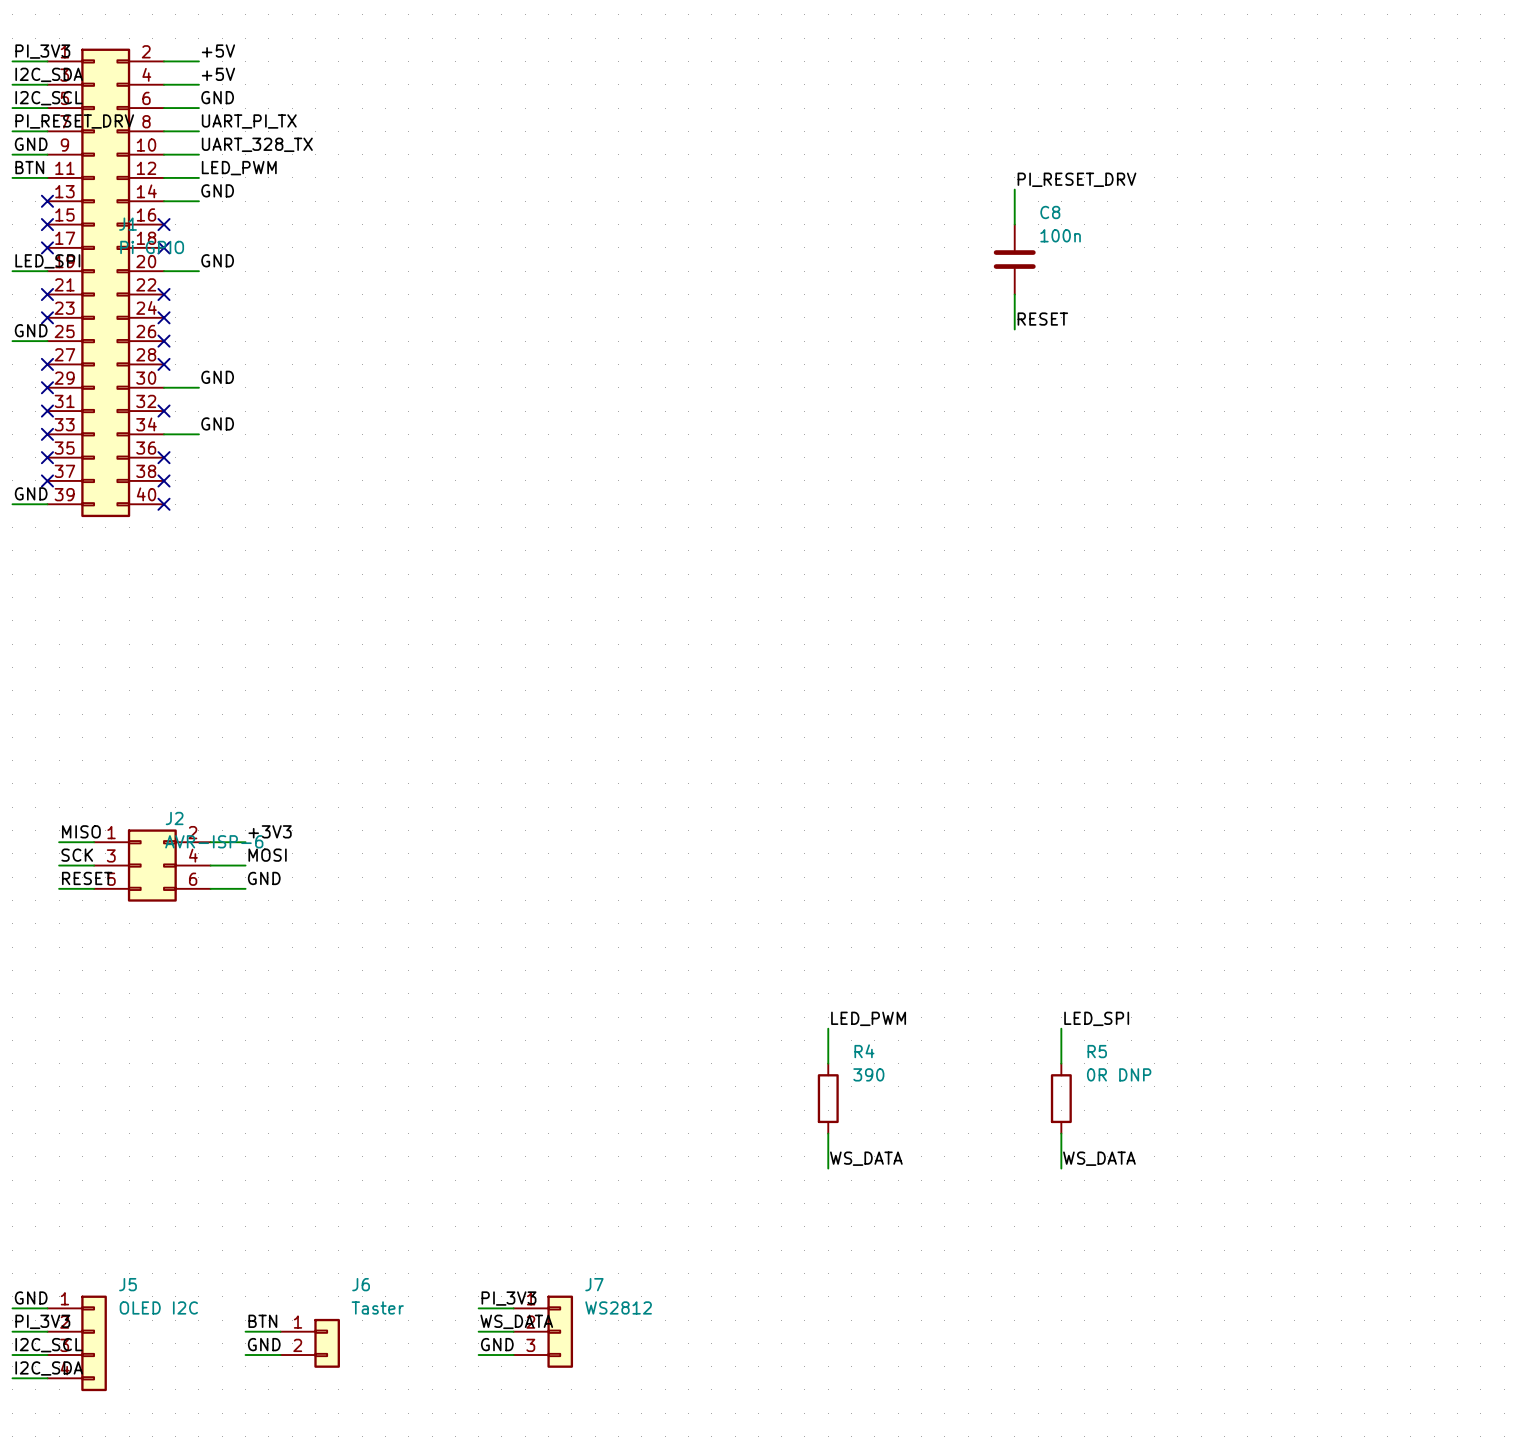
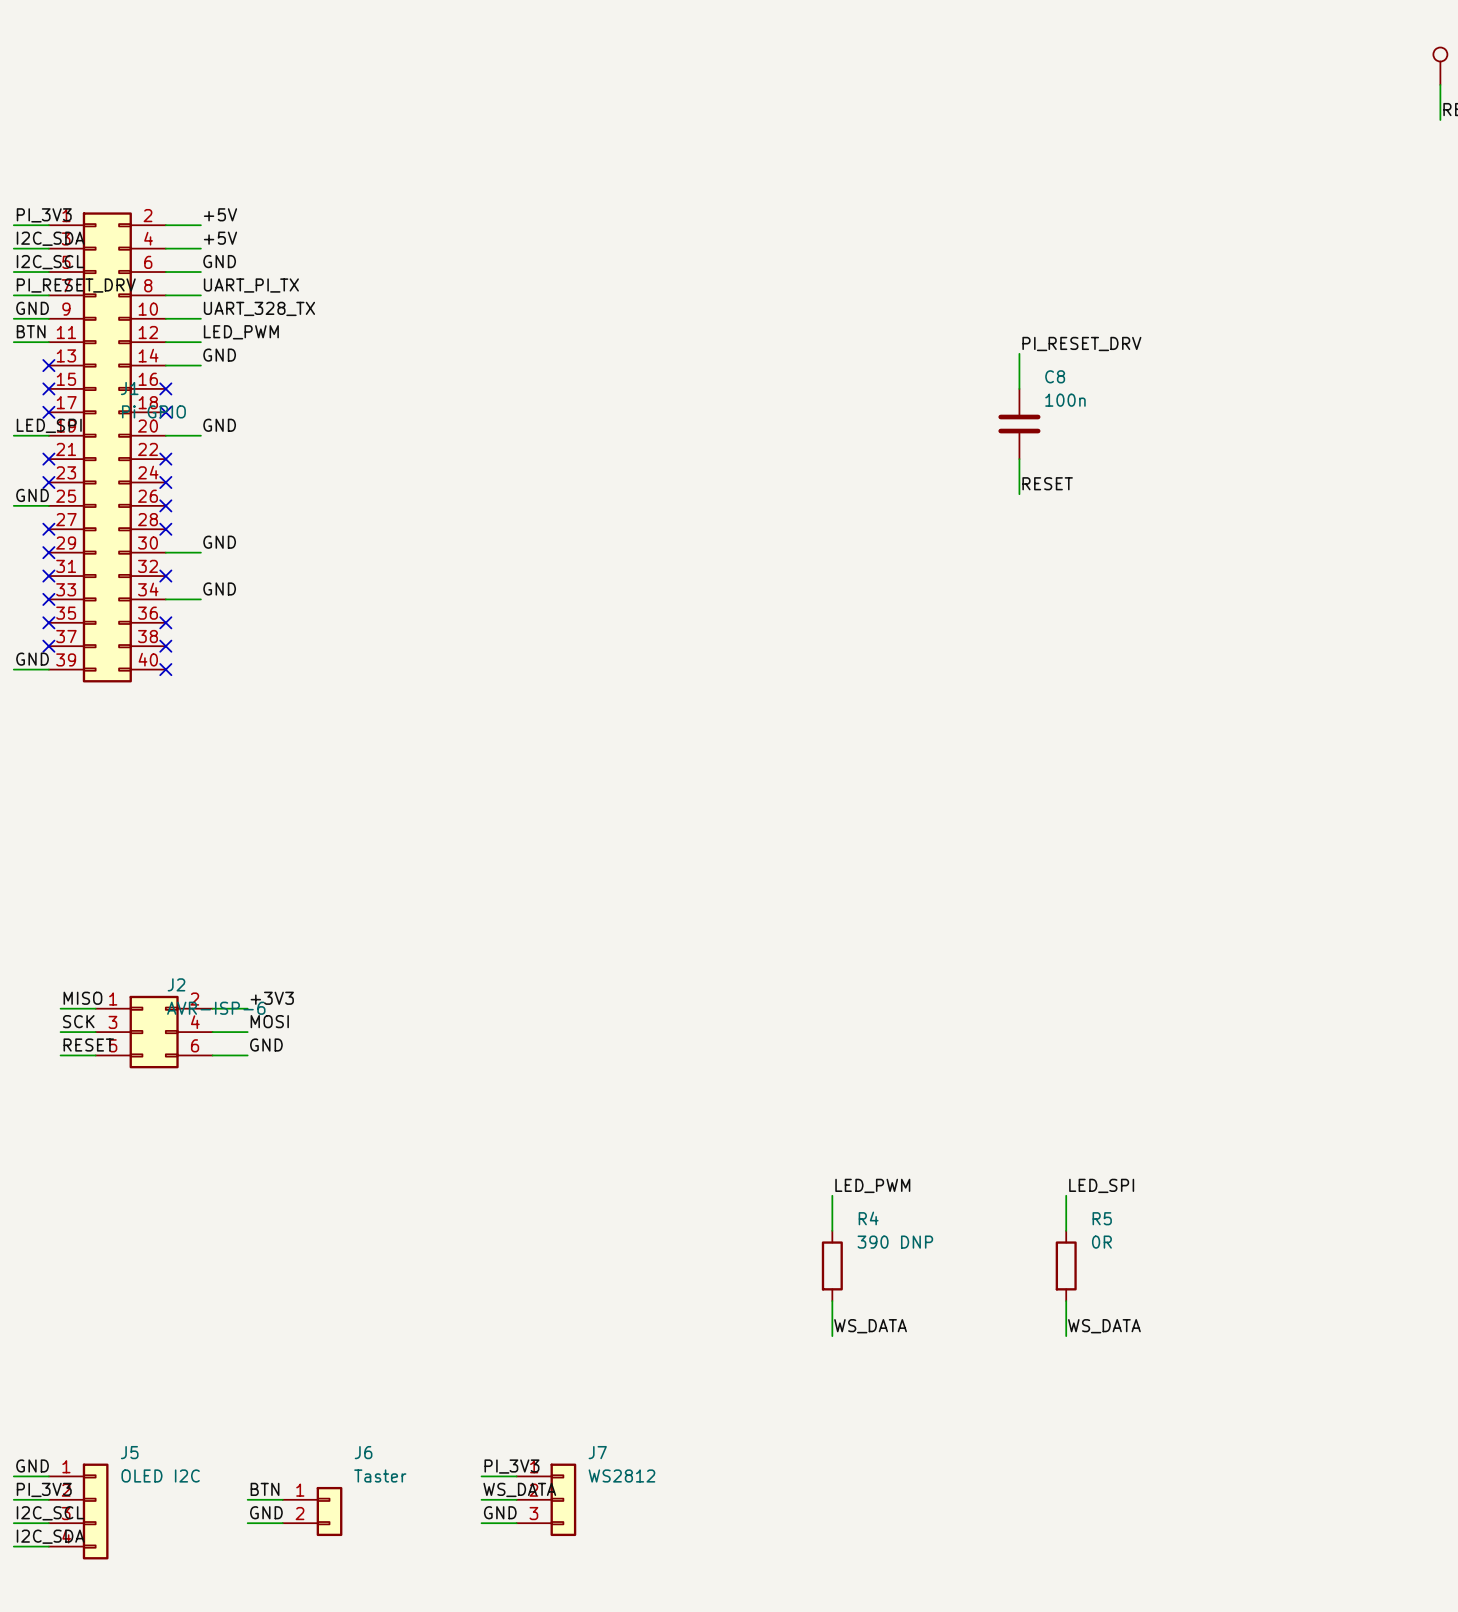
R4 value: 390 (868, 1074) -> 390 DNP (895, 1242)
R5 value: 0R DNP (1119, 1074) -> 0R (1101, 1242)

